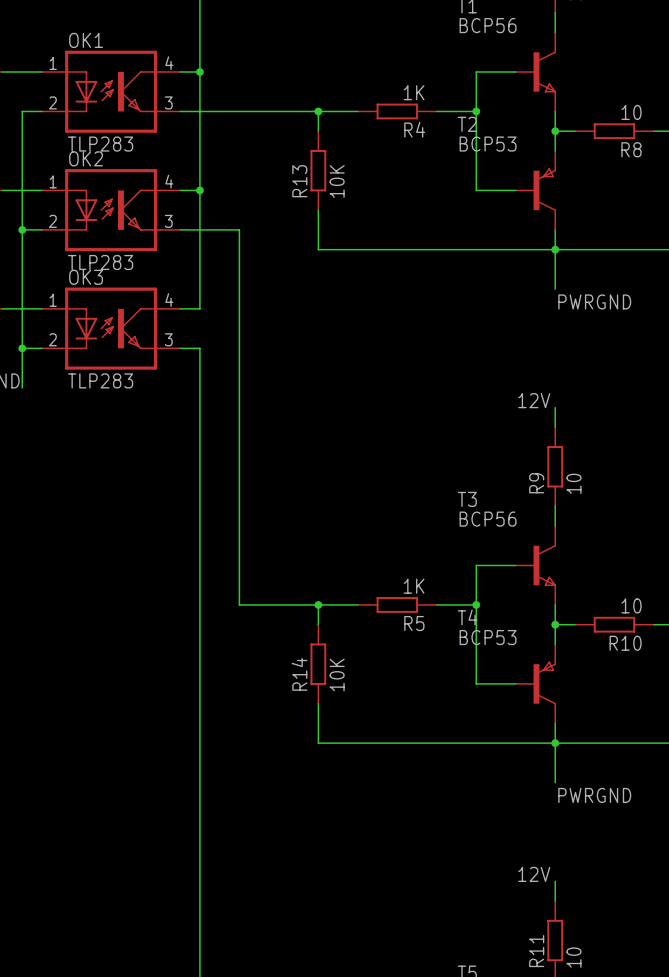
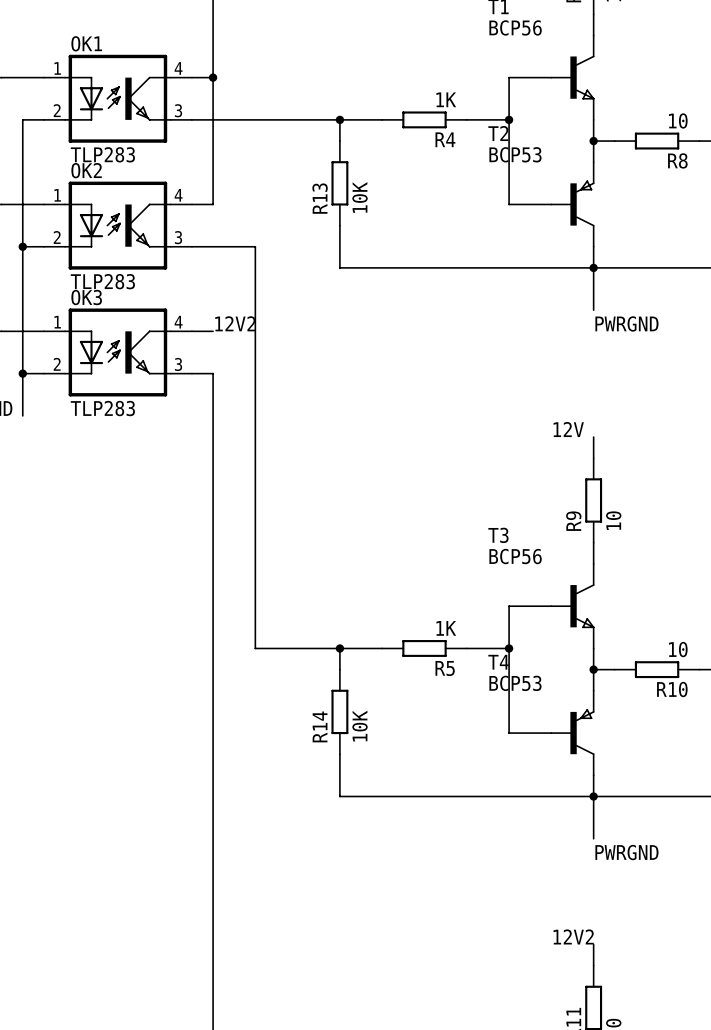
wire: (199, 190) (199, 308) -> none
junction: (199, 190) -> none
label: none -> 12V2 (235, 323)
label: 12V (534, 874) -> 12V2 (573, 936)

